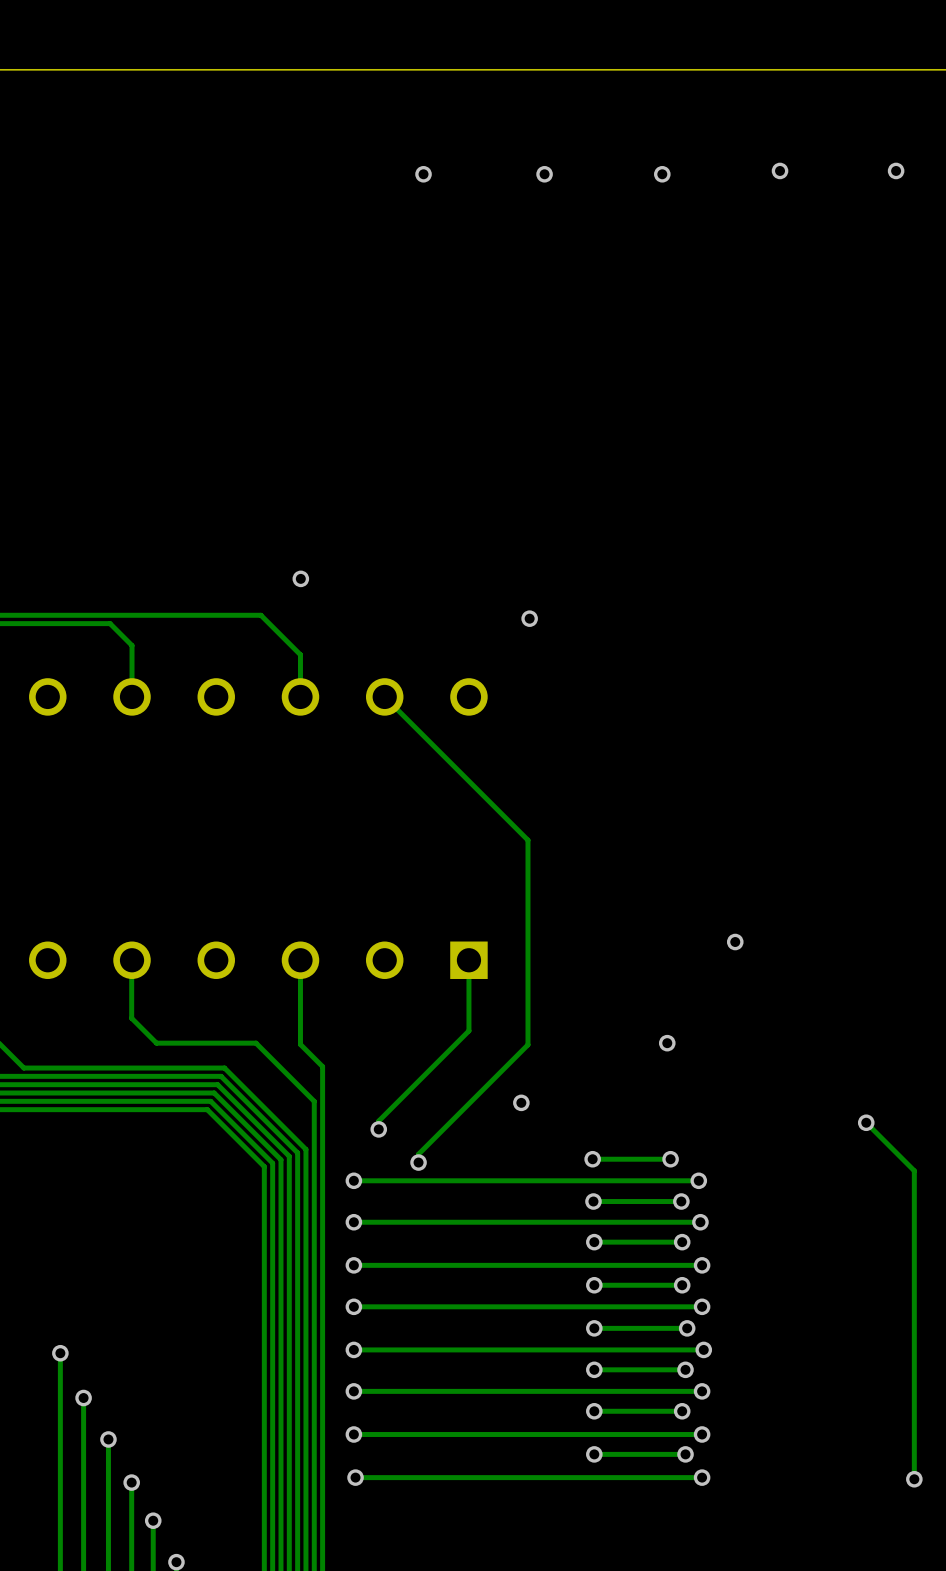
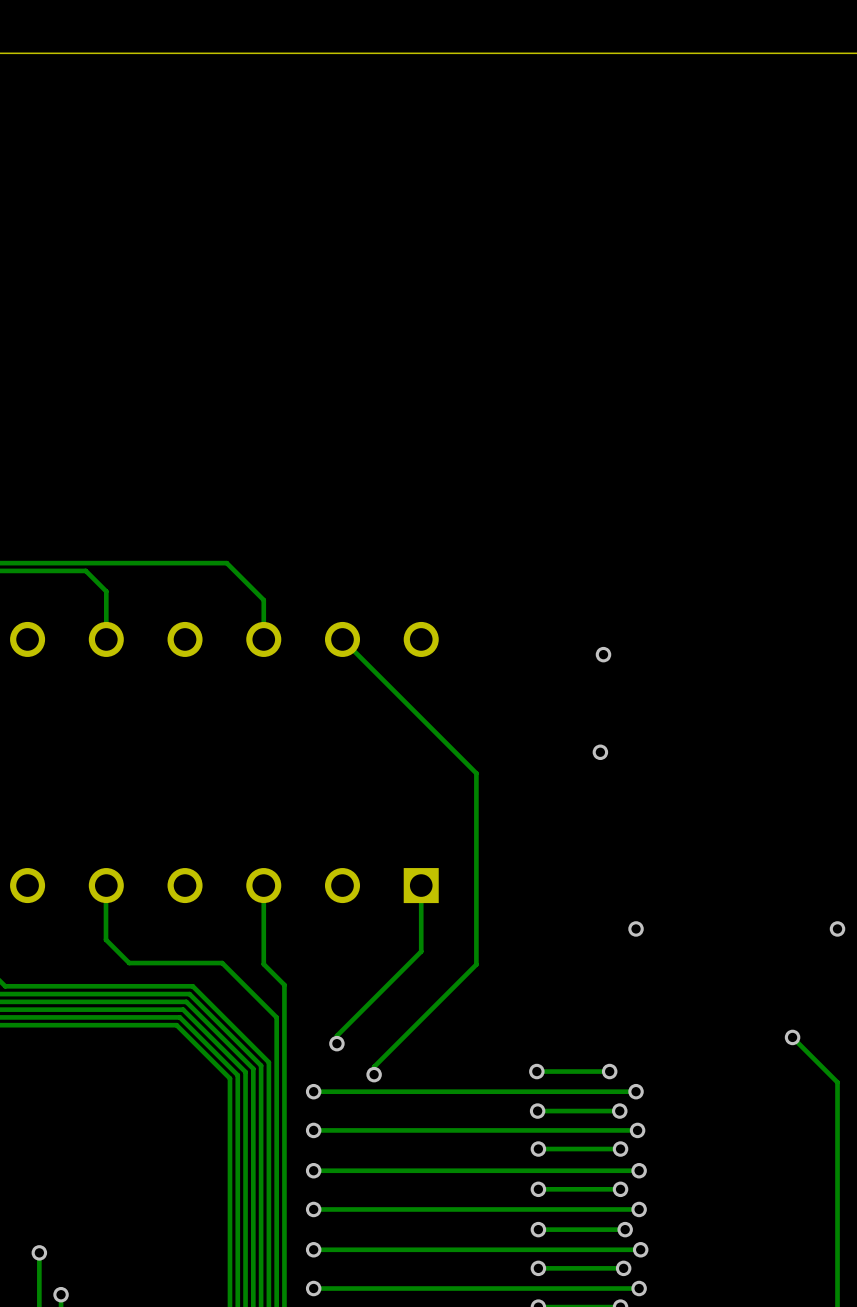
via: (780, 170) -> none
via: (896, 170) -> none
via: (423, 174) -> none
via: (544, 174) -> none
via: (662, 174) -> none
via: (300, 578) -> none
via: (529, 618) -> none
via: none -> (603, 654)
via: none -> (600, 752)
via: (735, 942) -> none
via: none -> (636, 928)
via: none -> (837, 928)
via: (667, 1043) -> none
via: (521, 1102) -> none

